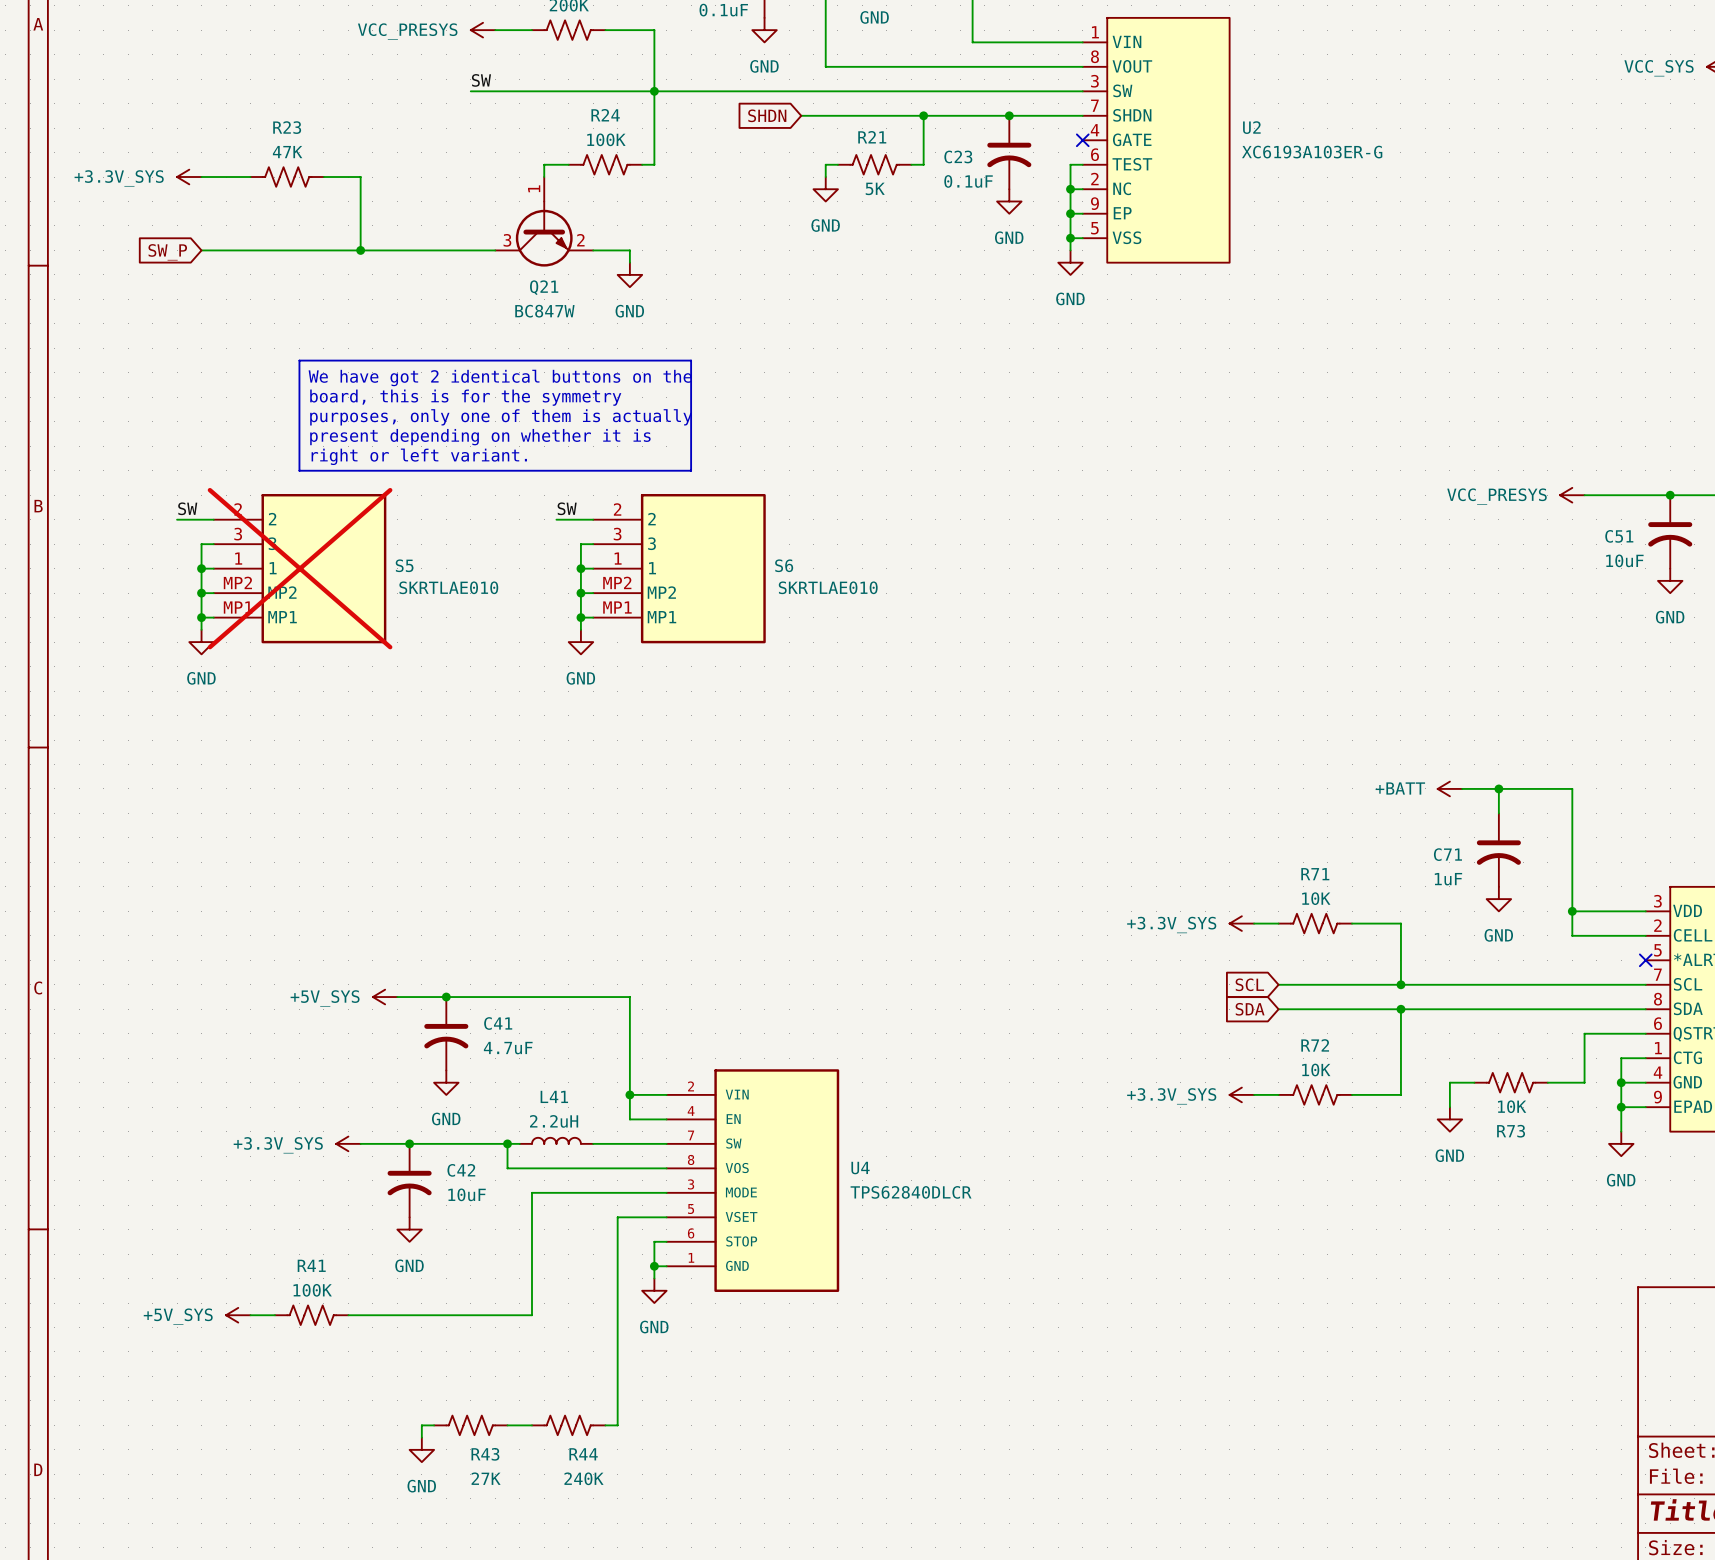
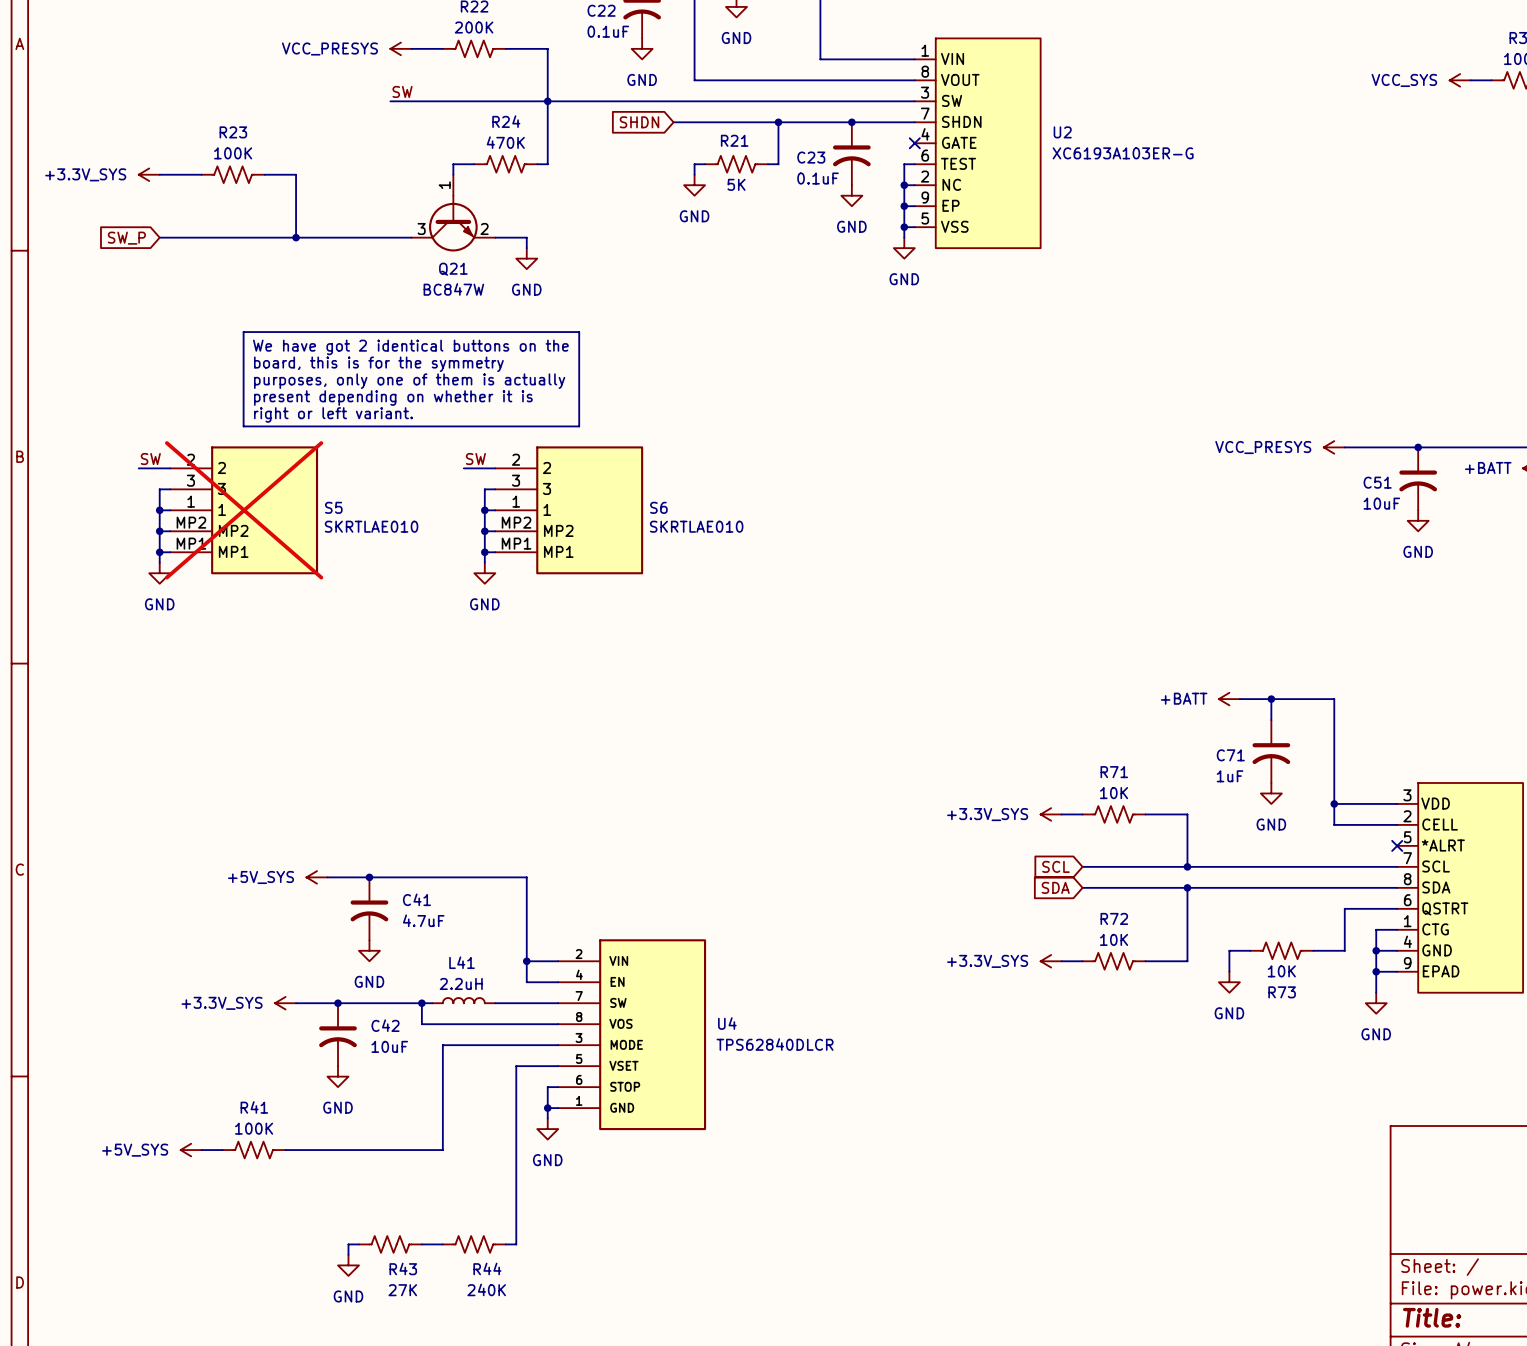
R24 value: 100K (606, 139) -> 470K (505, 142)
R23 value: 47K (287, 152) -> 100K (233, 153)

